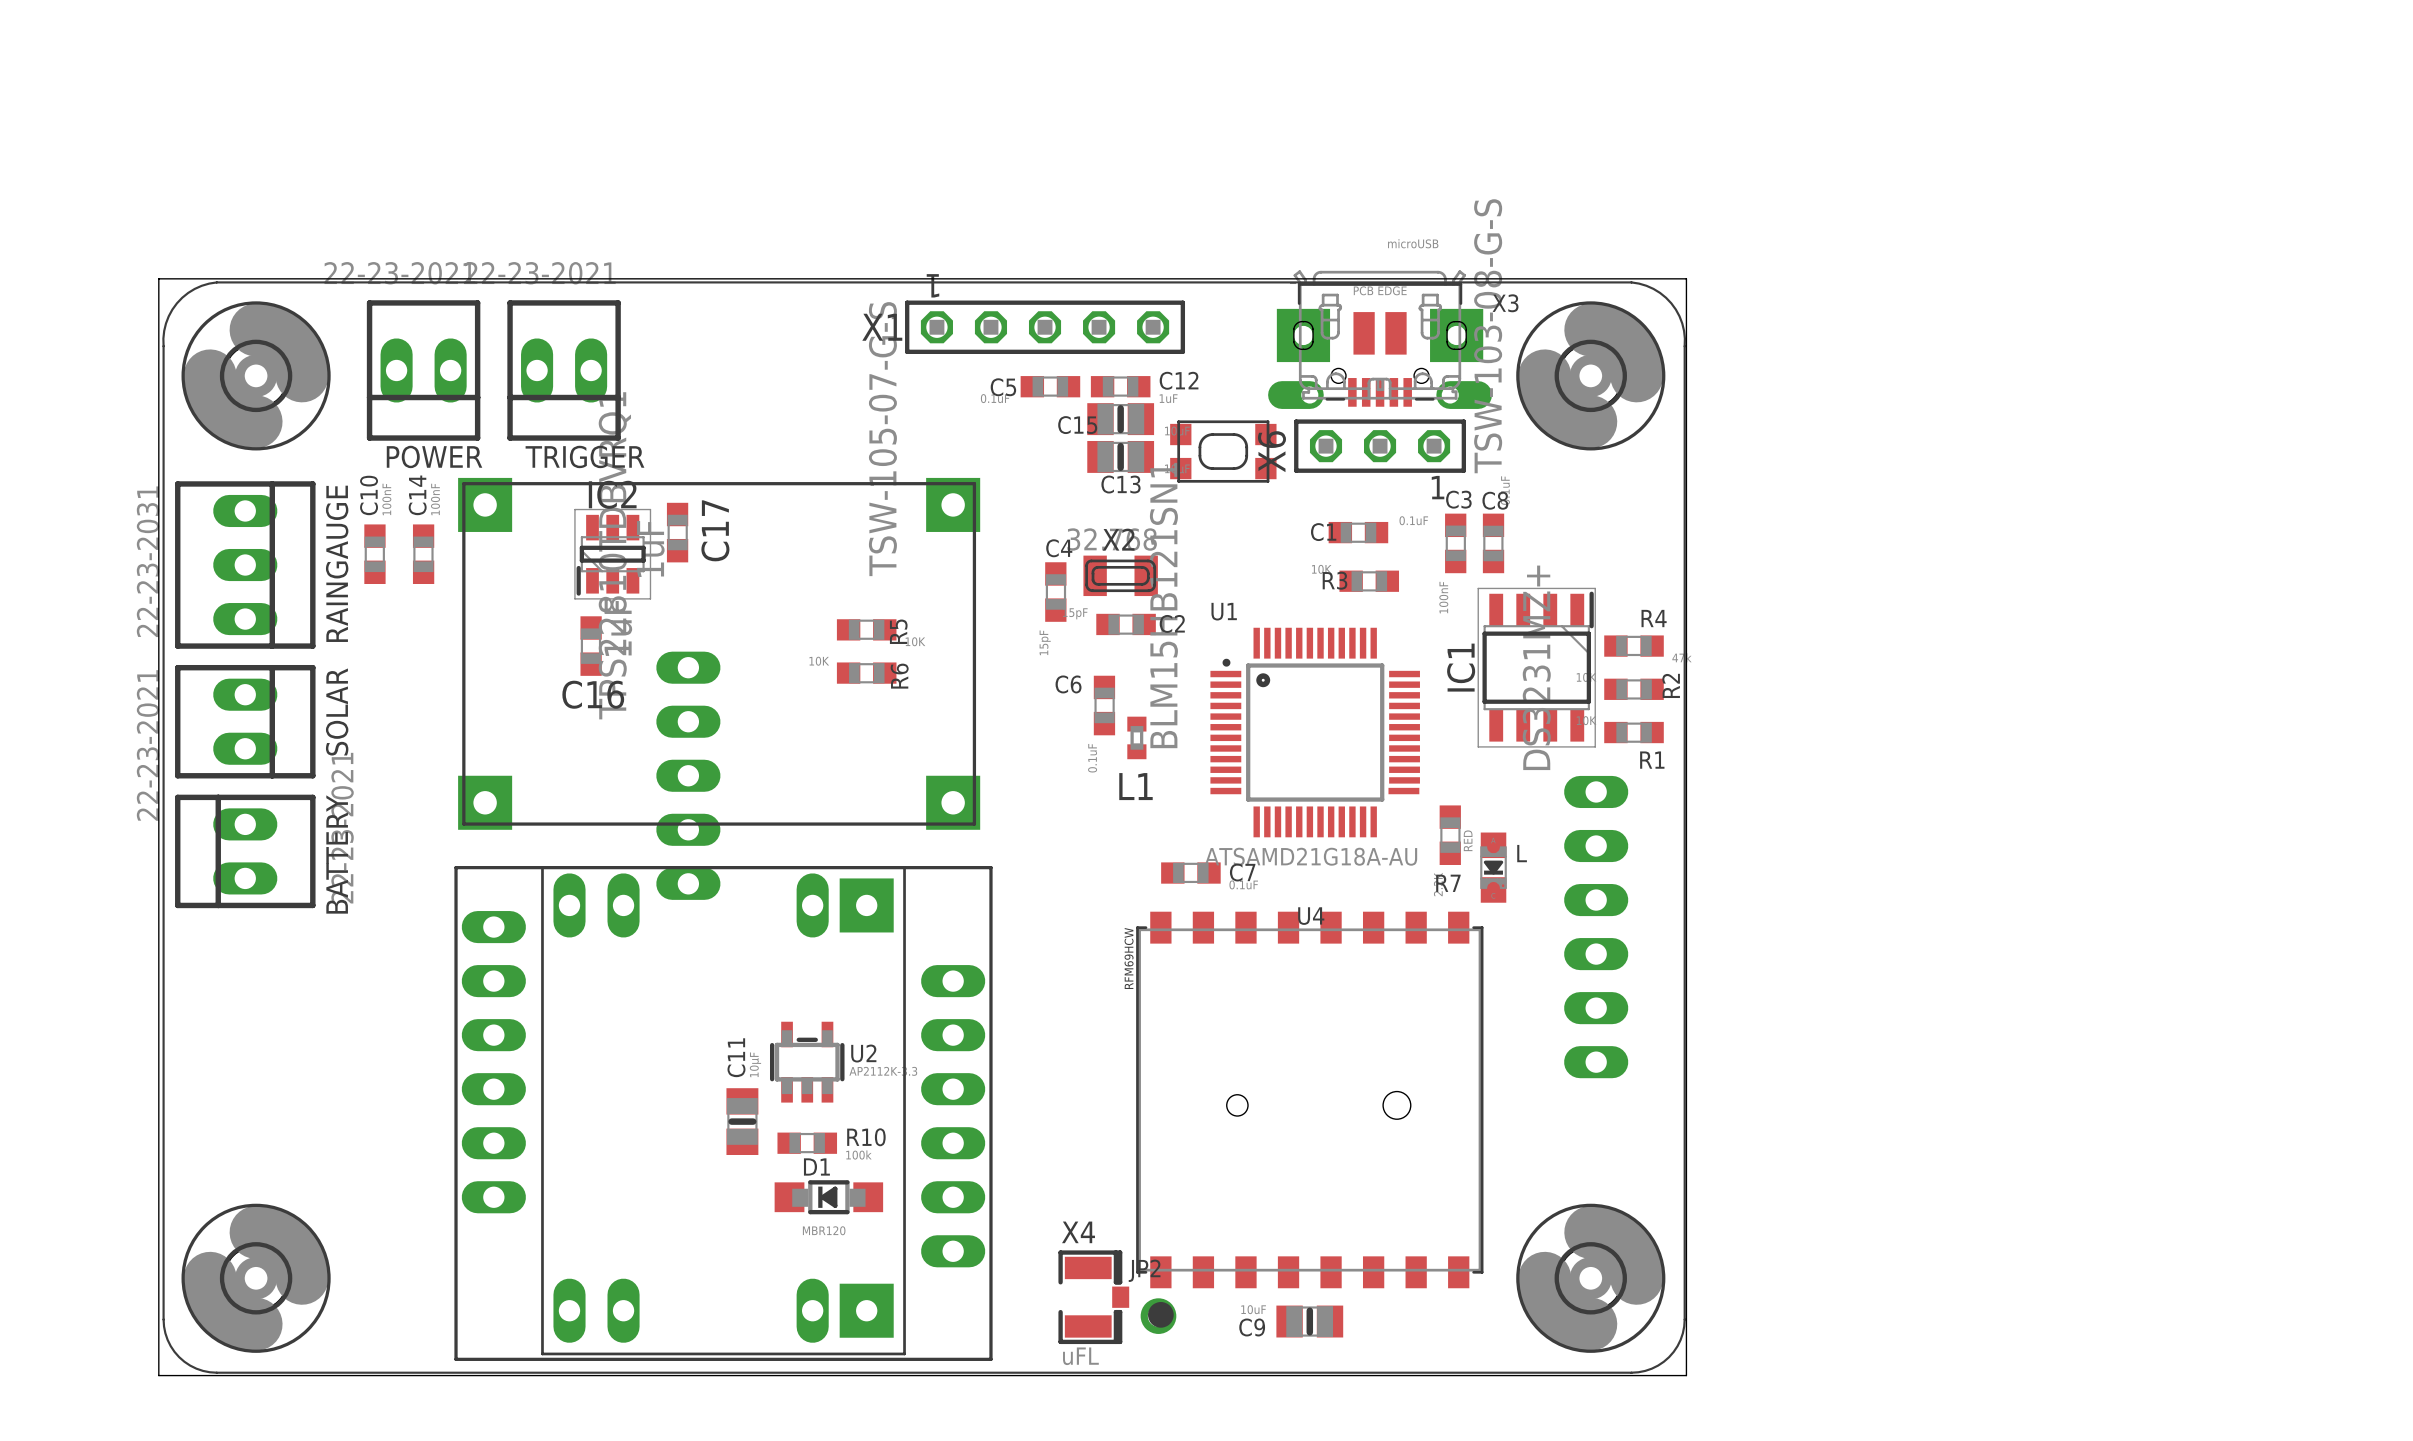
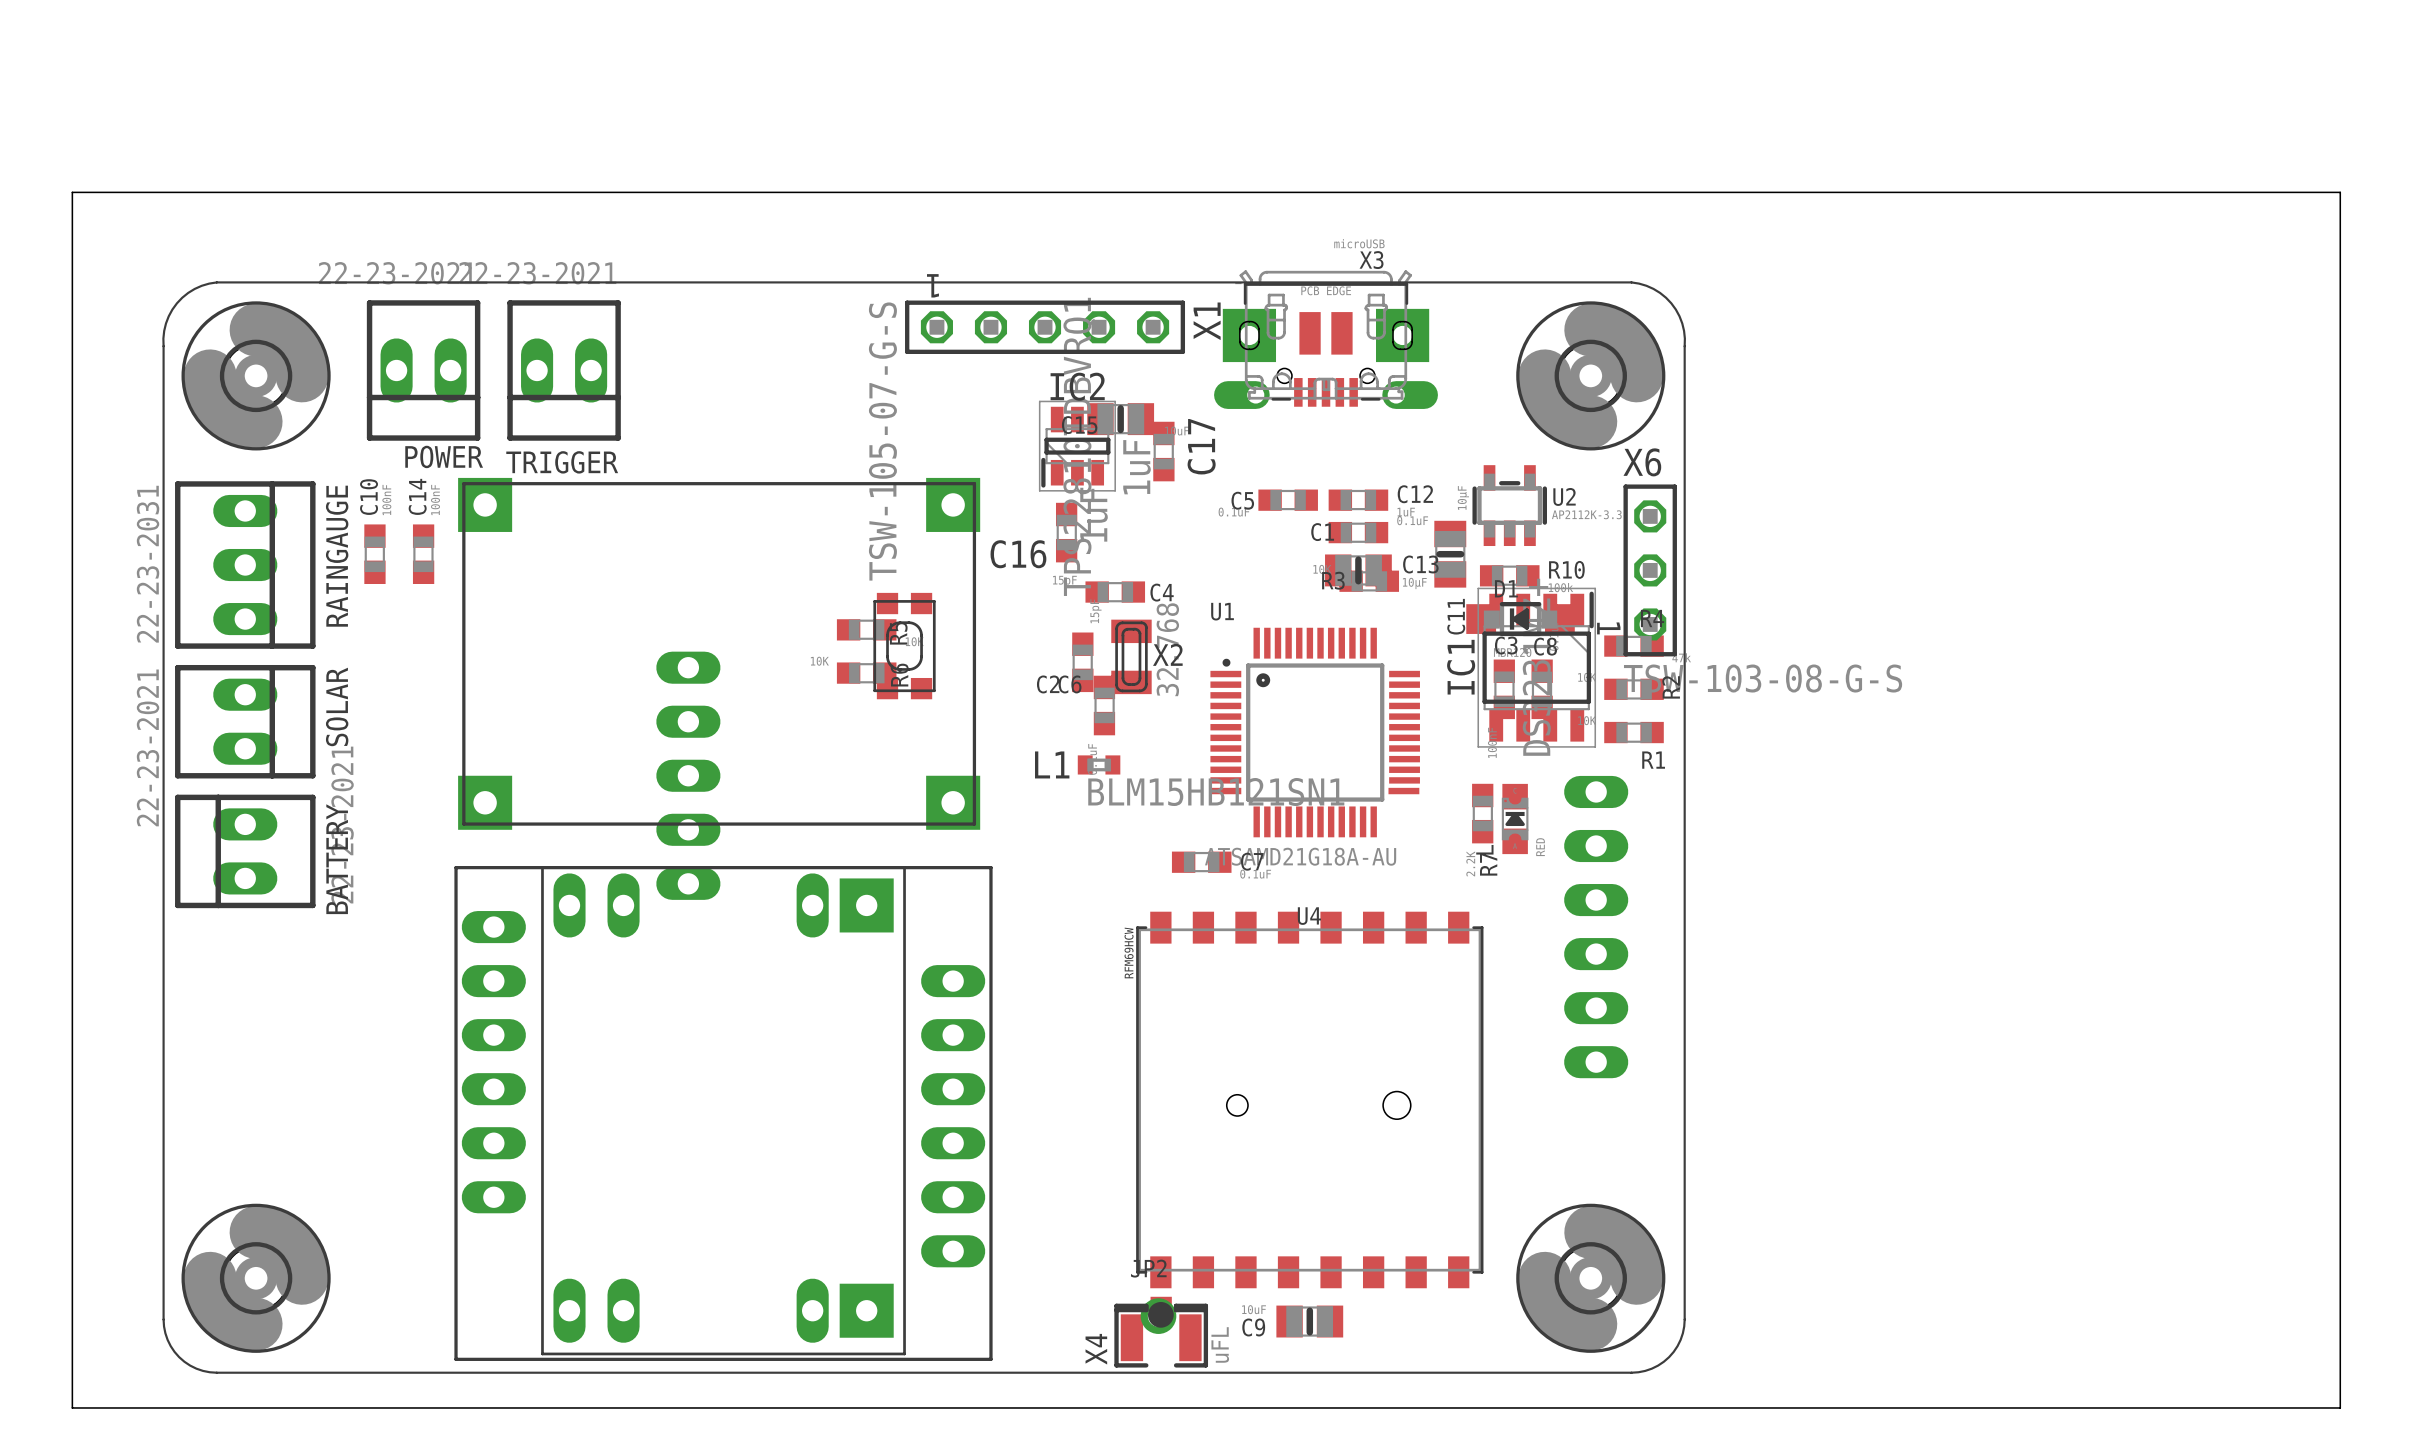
board edge: (158, 278) (1686, 278) (1686, 1375) (158, 1375) (158, 278) -> (72, 192) (72, 1407) (2340, 1407) (2340, 192) (72, 192)
X3 name position: X3 (1505, 303) -> X3 (1371, 260)
X1 name rotation: 0° (882, 327) -> 90° counterclockwise (1207, 321)
X1 name position: X1 (882, 327) -> X1 (1207, 321)
X3 position: (1380, 339) -> (1326, 339)
C5 position: (1050, 386) -> (1288, 500)
C12 position: (1120, 386) -> (1358, 500)
X6 rotation: 0° (1380, 446) -> 90° clockwise (1650, 570)
X6 position: (1380, 446) -> (1650, 570)
part rotation: 0° (1223, 451) -> 90° clockwise (904, 646)
part position: (1223, 451) -> (904, 646)
TRIGGER name position: TRIGGER (584, 456) -> TRIGGER (562, 462)
C13 position: (1120, 456) -> (1358, 570)
C13 name position: C13 (1120, 484) -> C13 (1420, 564)
C17 position: (677, 532) -> (1163, 451)
C3 position: (1455, 543) -> (1504, 689)
C8 position: (1493, 543) -> (1542, 689)
IC2 position: (612, 554) -> (1077, 446)
X2 rotation: 0° (1120, 575) -> 90° clockwise (1131, 656)
X2 position: (1120, 575) -> (1131, 656)
C4 rotation: 0° (1055, 592) -> 90° clockwise (1115, 592)
C4 position: (1055, 592) -> (1115, 592)
C2 name position: C2 (1172, 623) -> C2 (1048, 684)
C2 rotation: 0° (1126, 624) -> 90° clockwise (1082, 662)
C2 position: (1126, 624) -> (1082, 662)
C16 position: (591, 646) -> (1066, 532)
C16 name position: C16 (593, 694) -> C16 (1018, 554)
L1 rotation: 0° (1136, 737) -> 90° clockwise (1099, 764)
L1 position: (1136, 737) -> (1099, 764)
R7 position: (1450, 835) -> (1482, 813)
L rotation: 0° (1493, 867) -> 180° (1515, 818)
L position: (1493, 867) -> (1515, 818)
C7 position: (1190, 873) -> (1201, 862)
R7 name rotation: 0° (1448, 883) -> 90° counterclockwise (1488, 864)
C11 name position: C11 (736, 1057) -> C11 (1456, 616)
U2 position: (807, 1062) -> (1509, 505)
C11 position: (742, 1121) -> (1450, 554)
R10 position: (807, 1143) -> (1509, 575)
D1 position: (828, 1197) -> (1520, 619)
X4 rotation: 0° (1093, 1297) -> 90° counterclockwise (1161, 1332)
X4 position: (1093, 1297) -> (1161, 1332)

